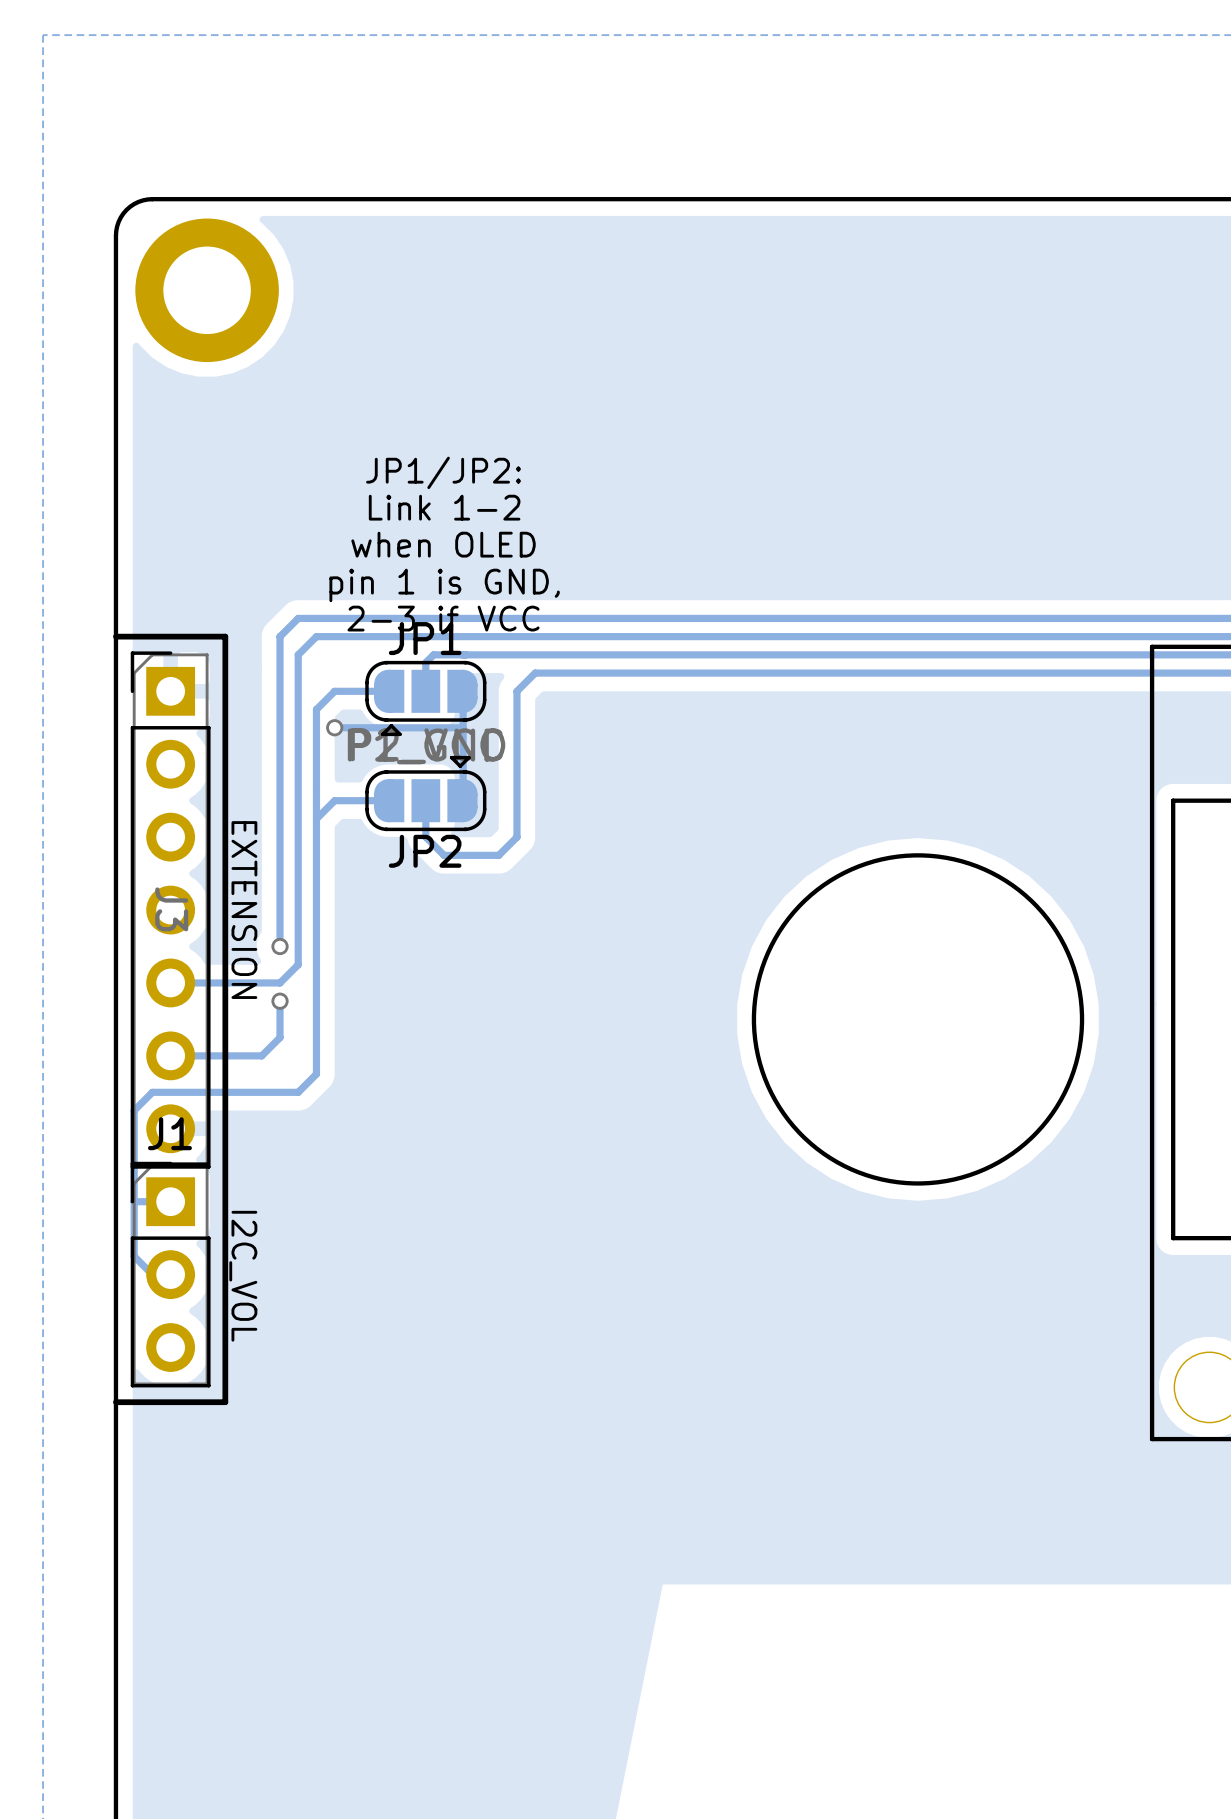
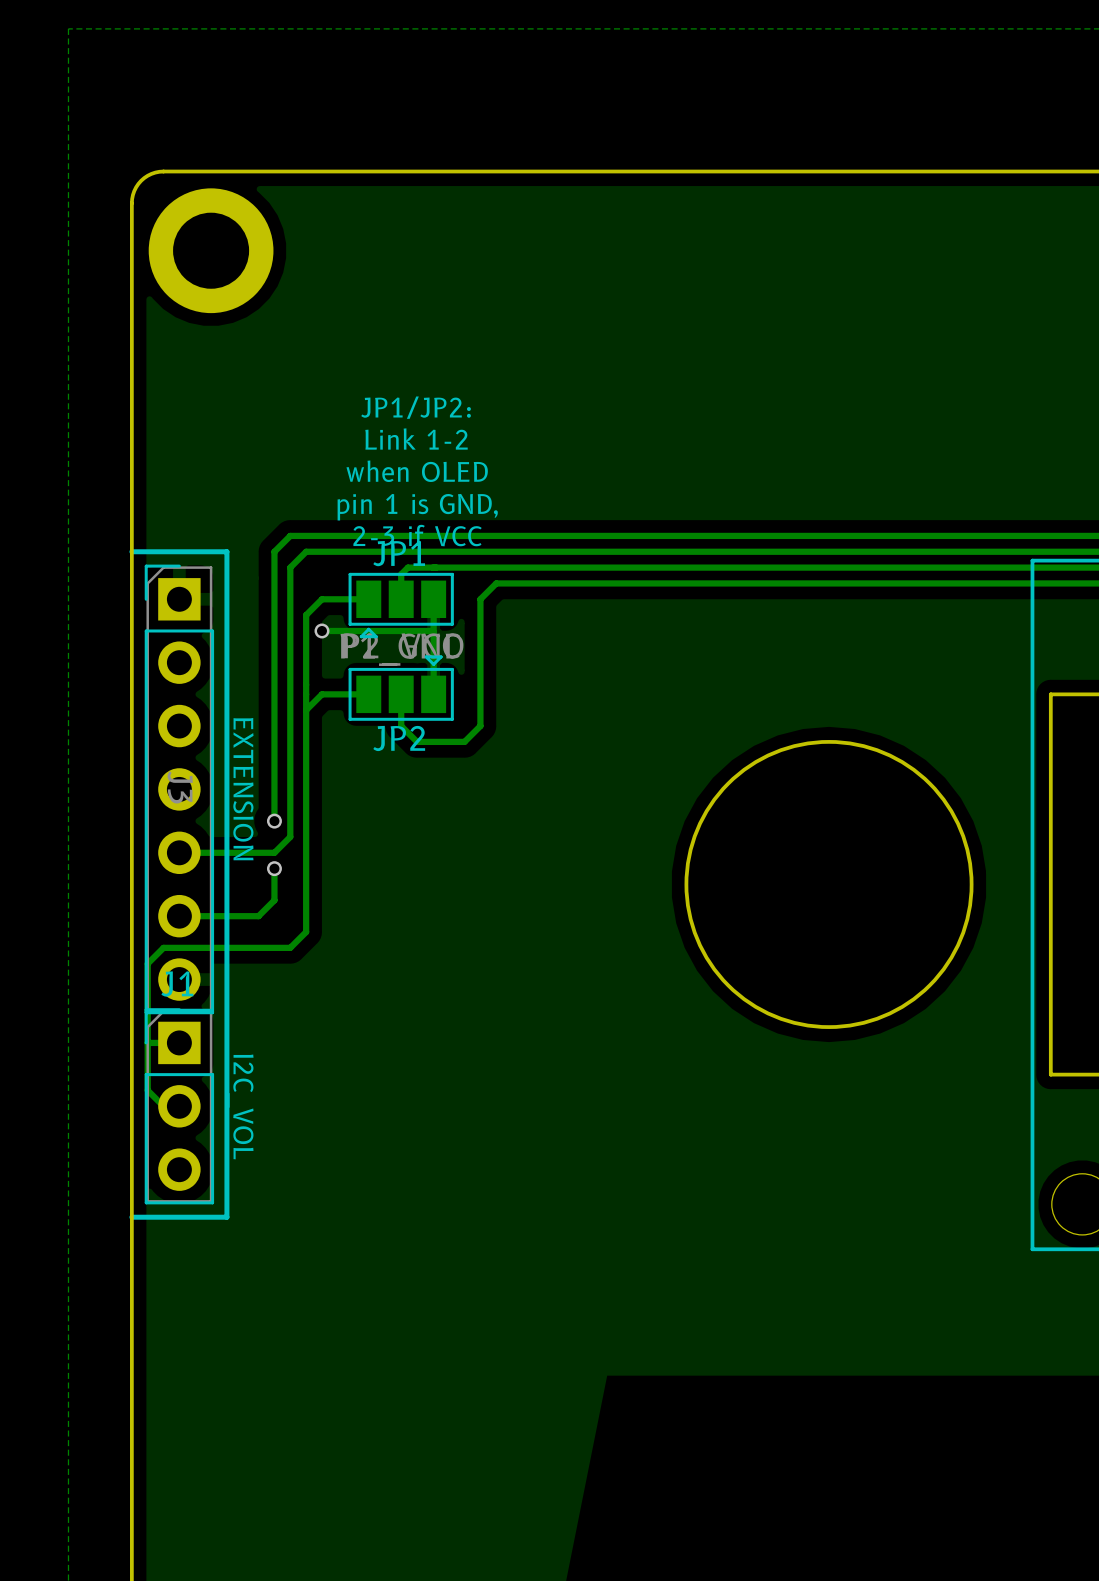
JP1 footprint: [365, 660, 487, 737] -> [348, 572, 454, 639]
JP2 footprint: [365, 755, 487, 832] -> [348, 655, 454, 721]

